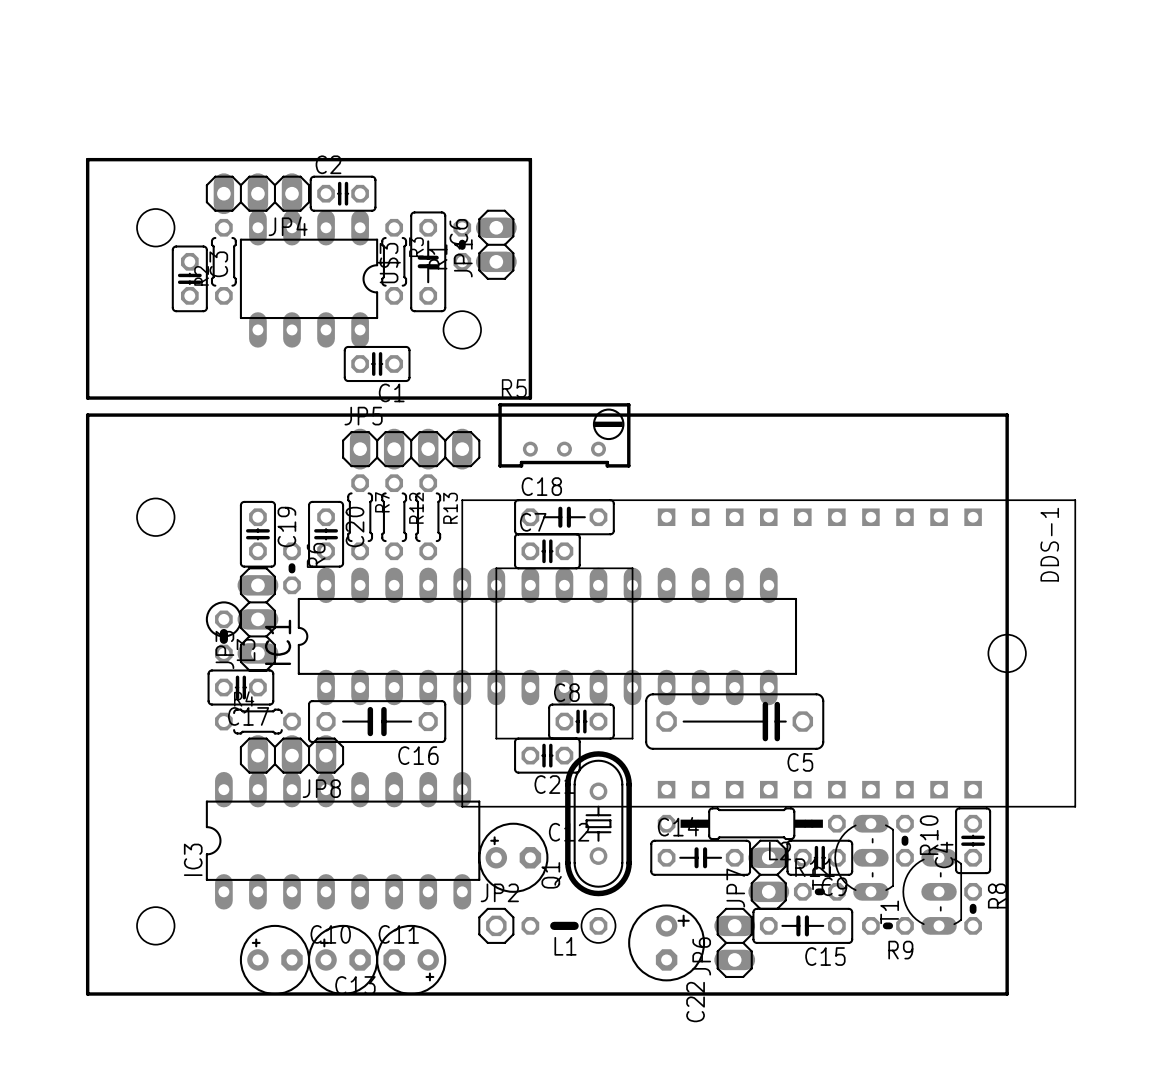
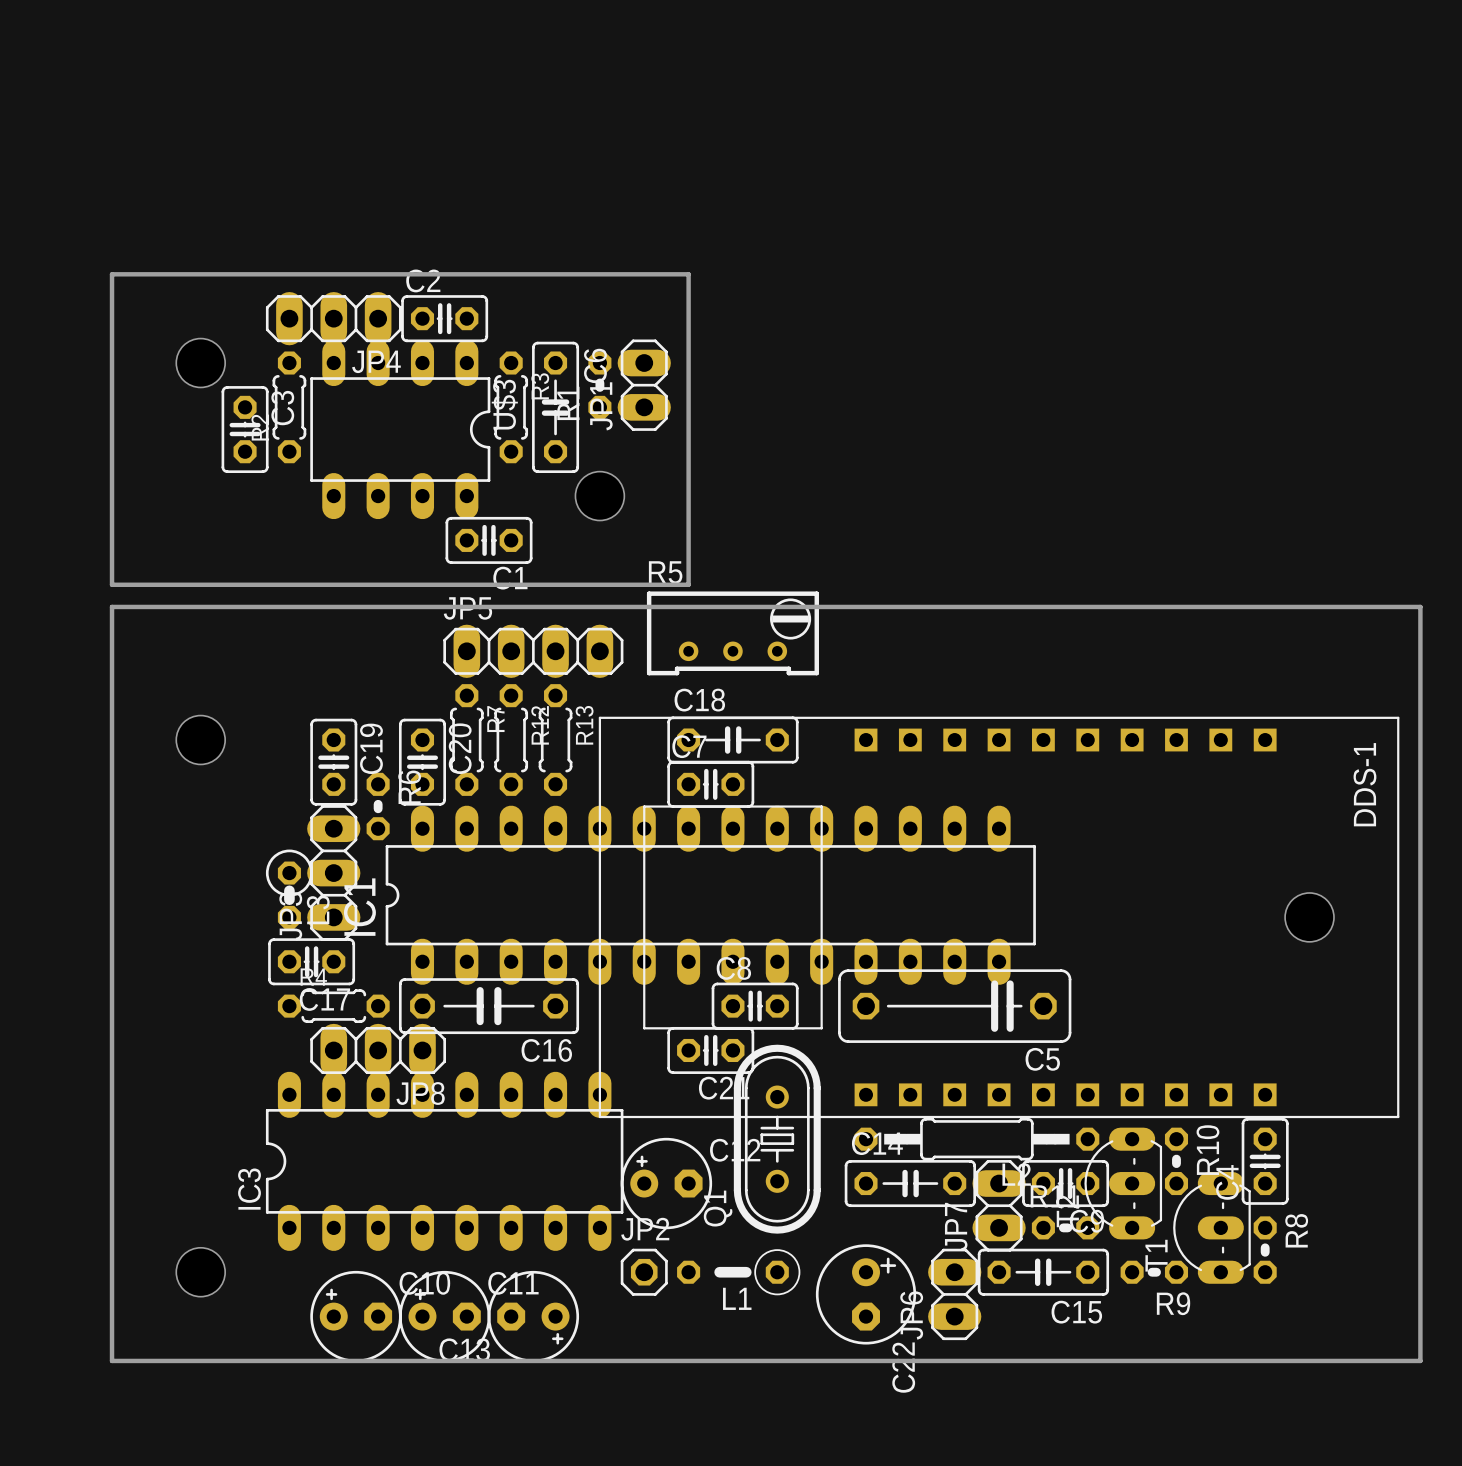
board edge: (1007, 415) (1007, 994) -> (1309, 606) (1420, 606) (1420, 1360) (1309, 1360)

